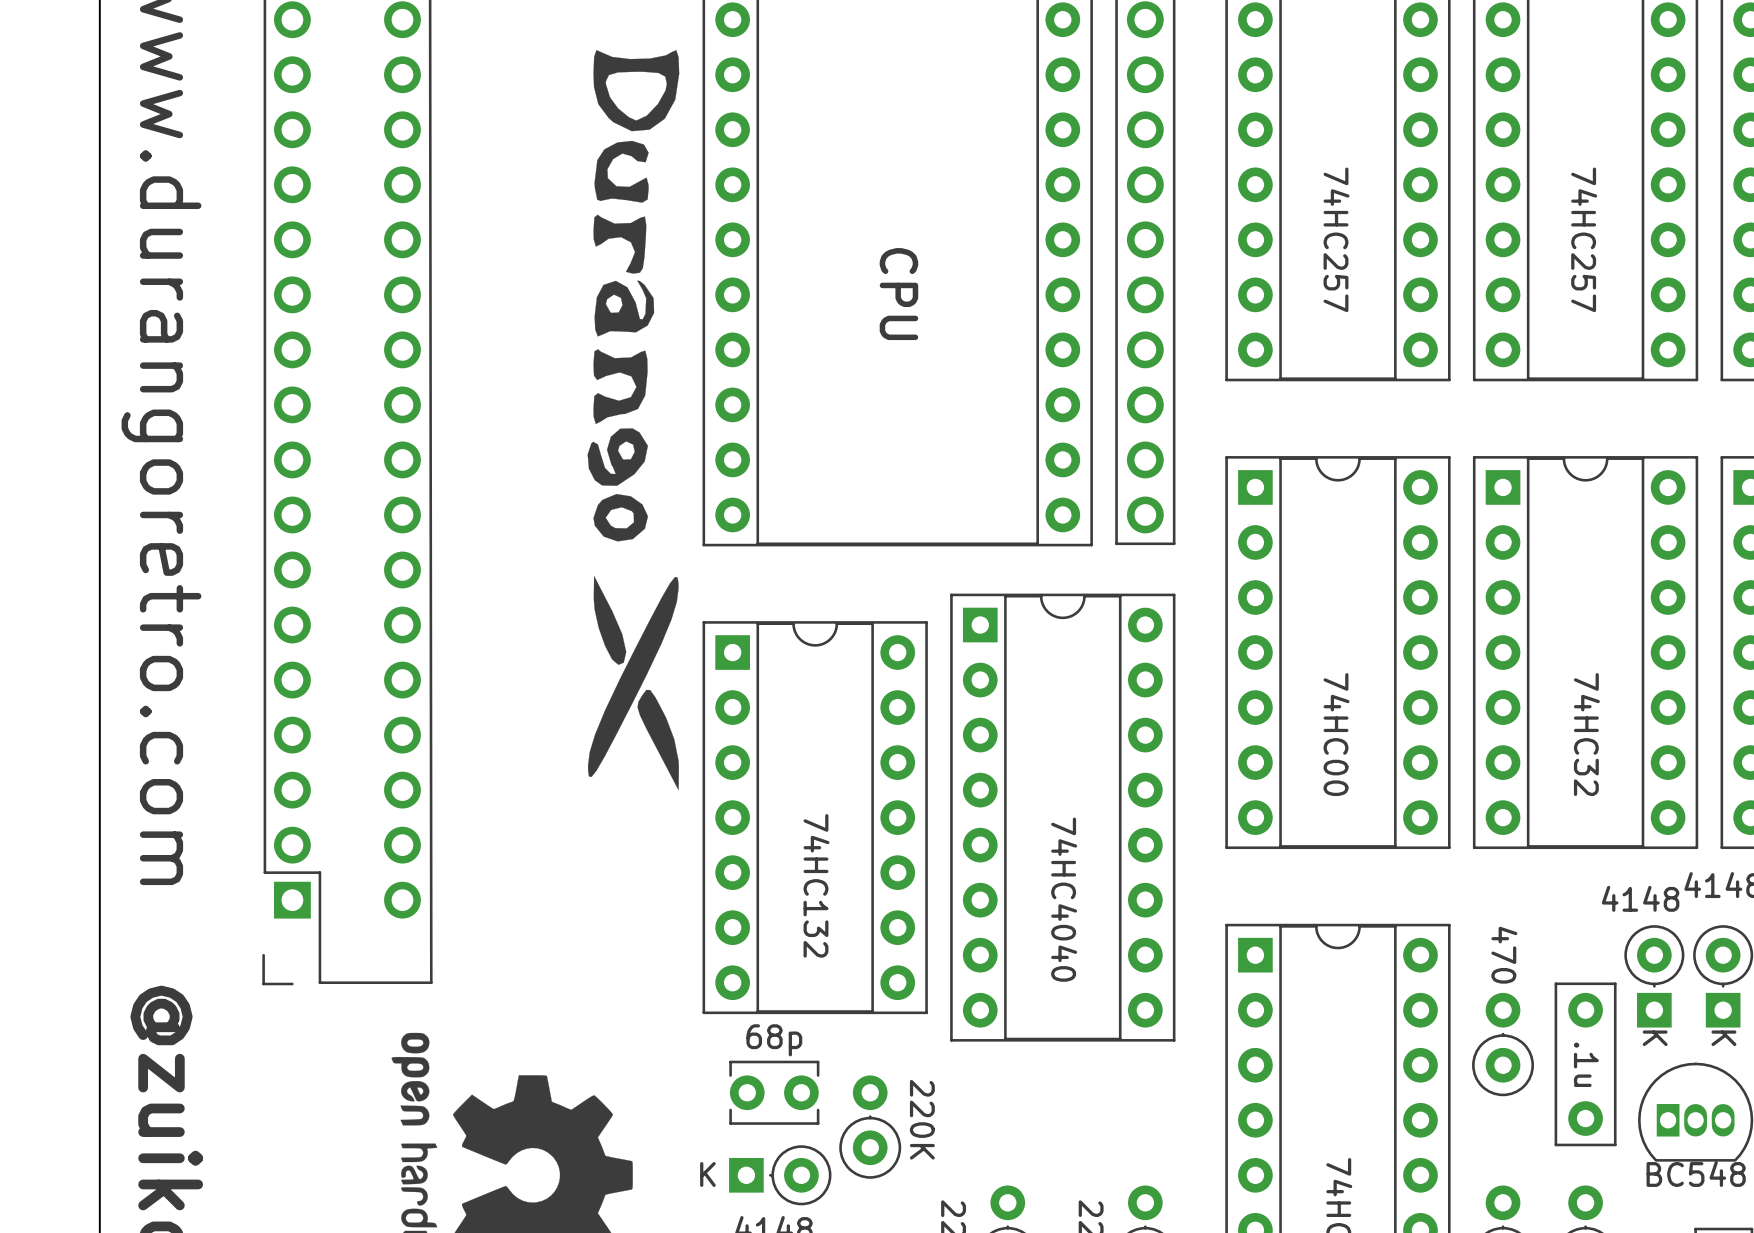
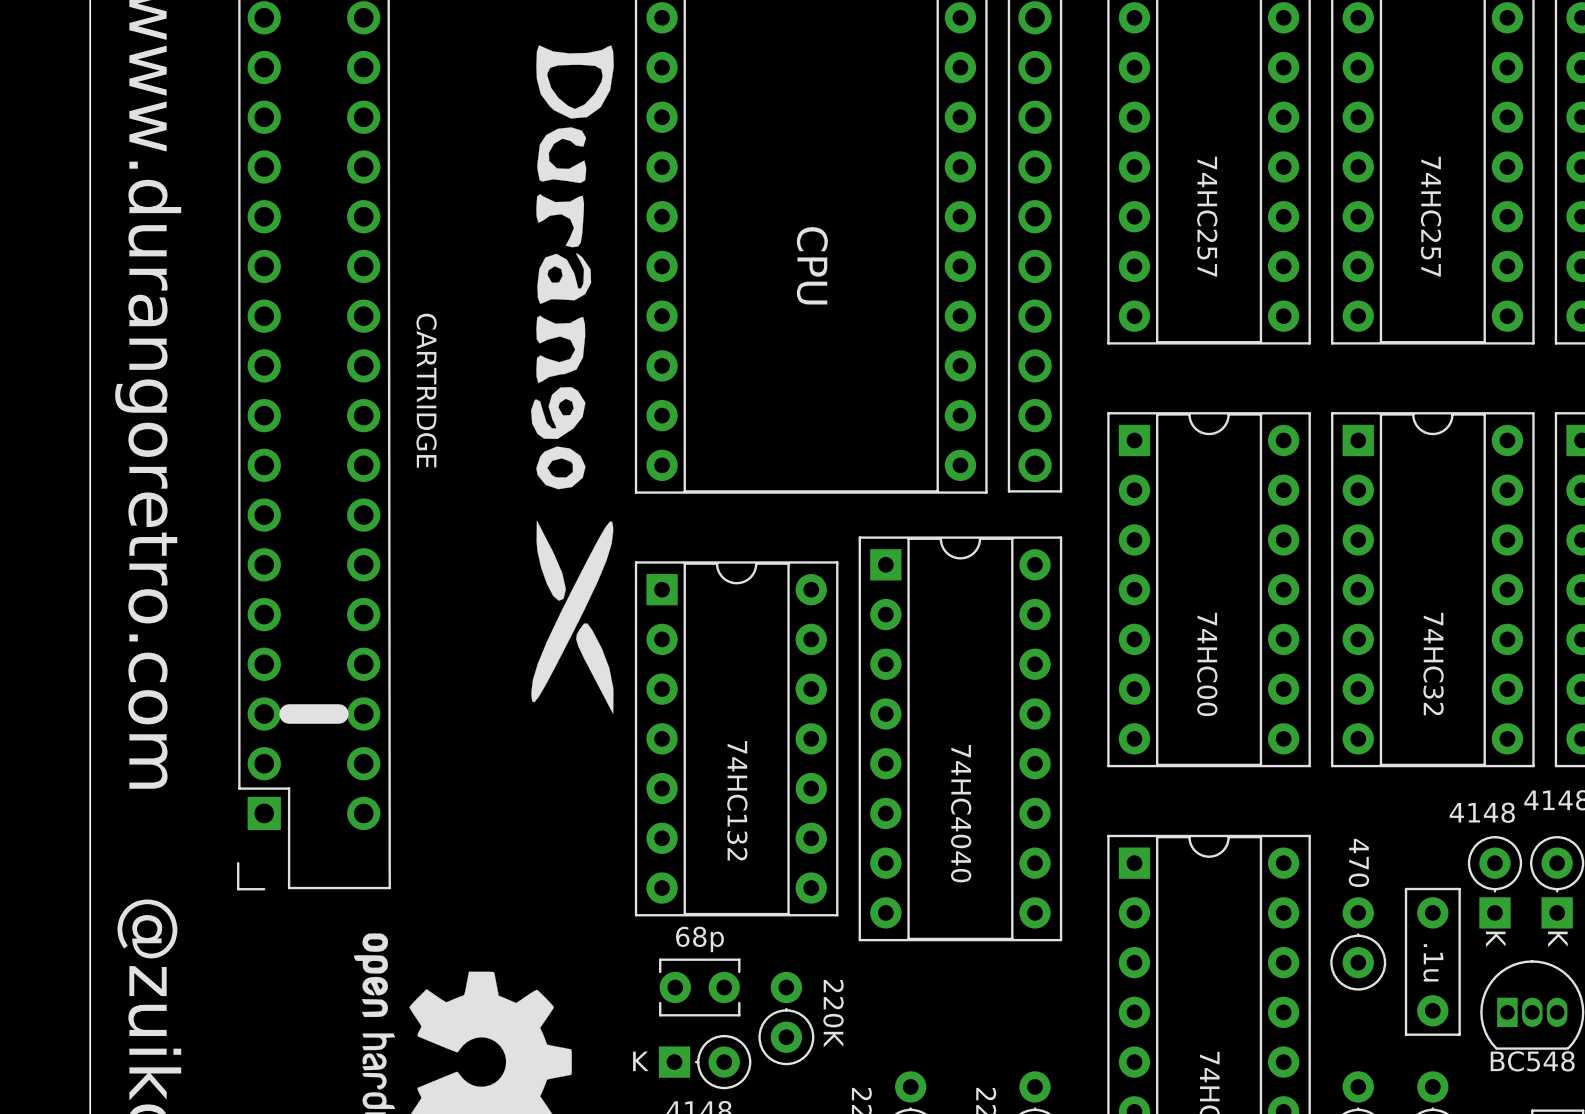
part value: none -> CARTRIDGE (426, 390)
line: none -> (289, 713) (338, 713)

